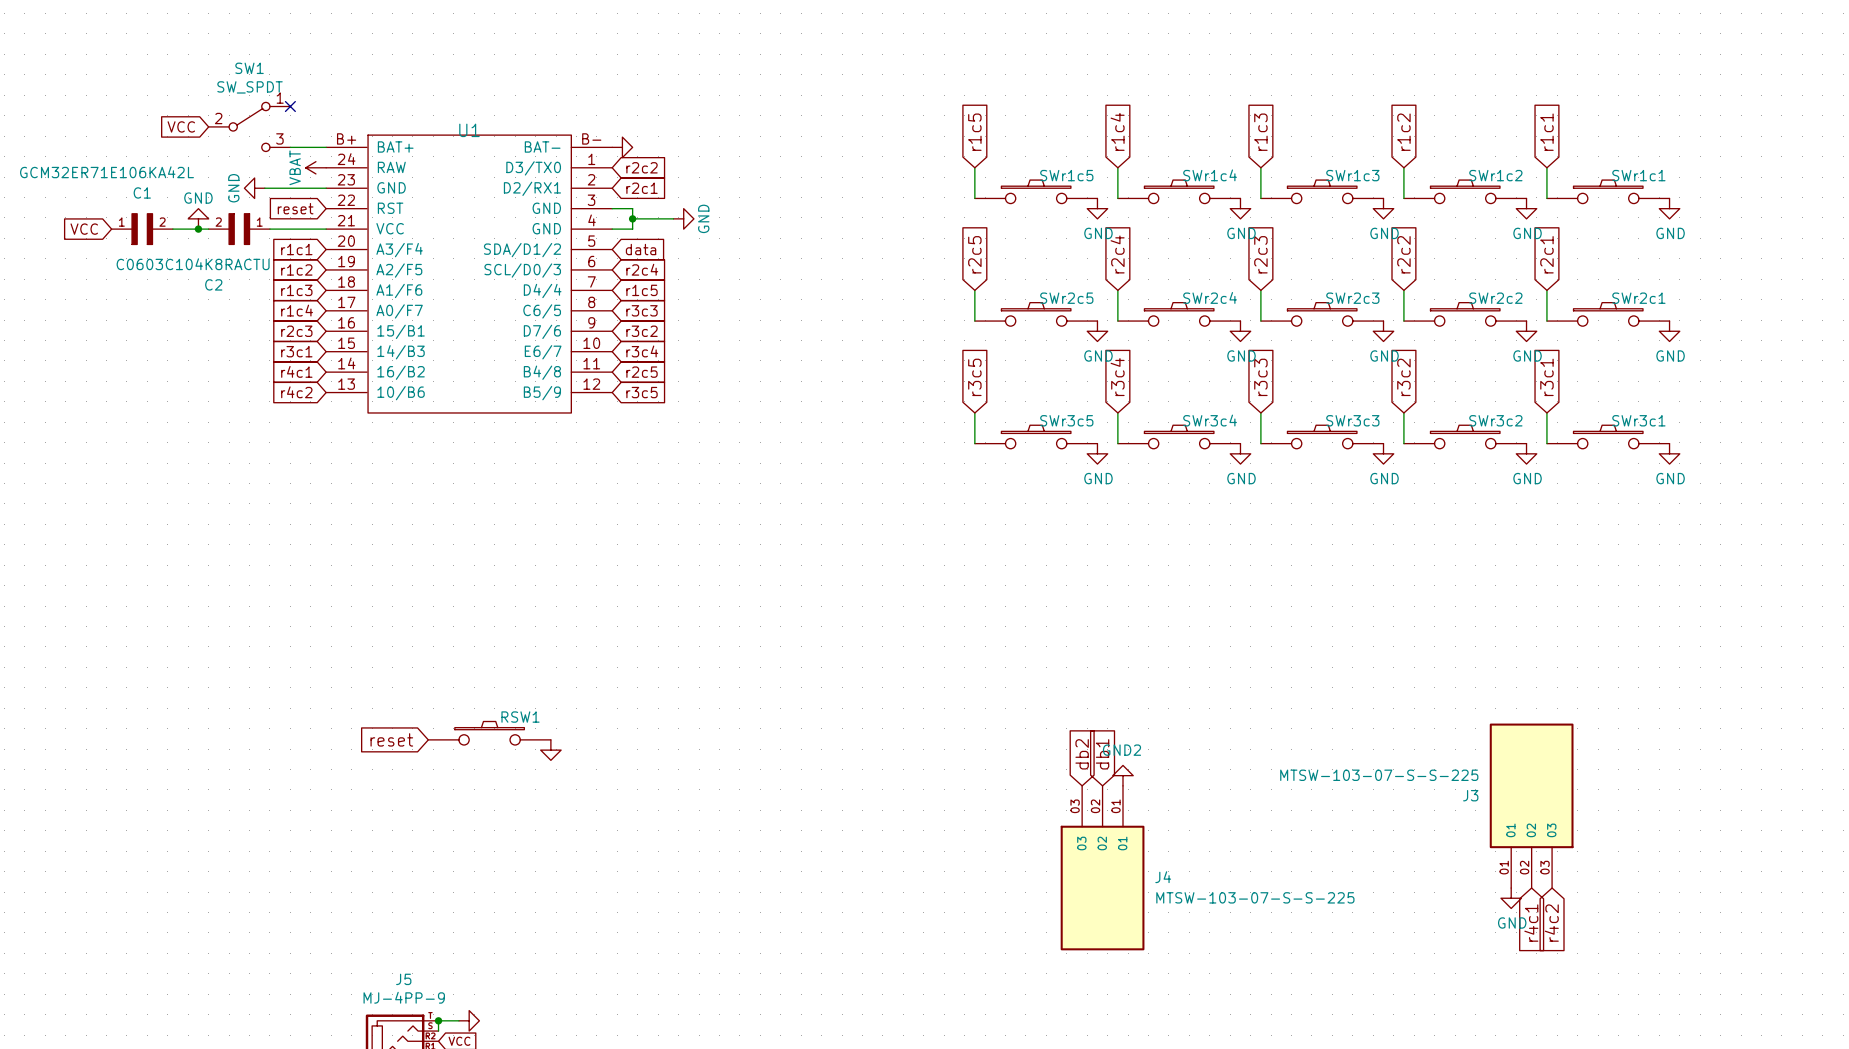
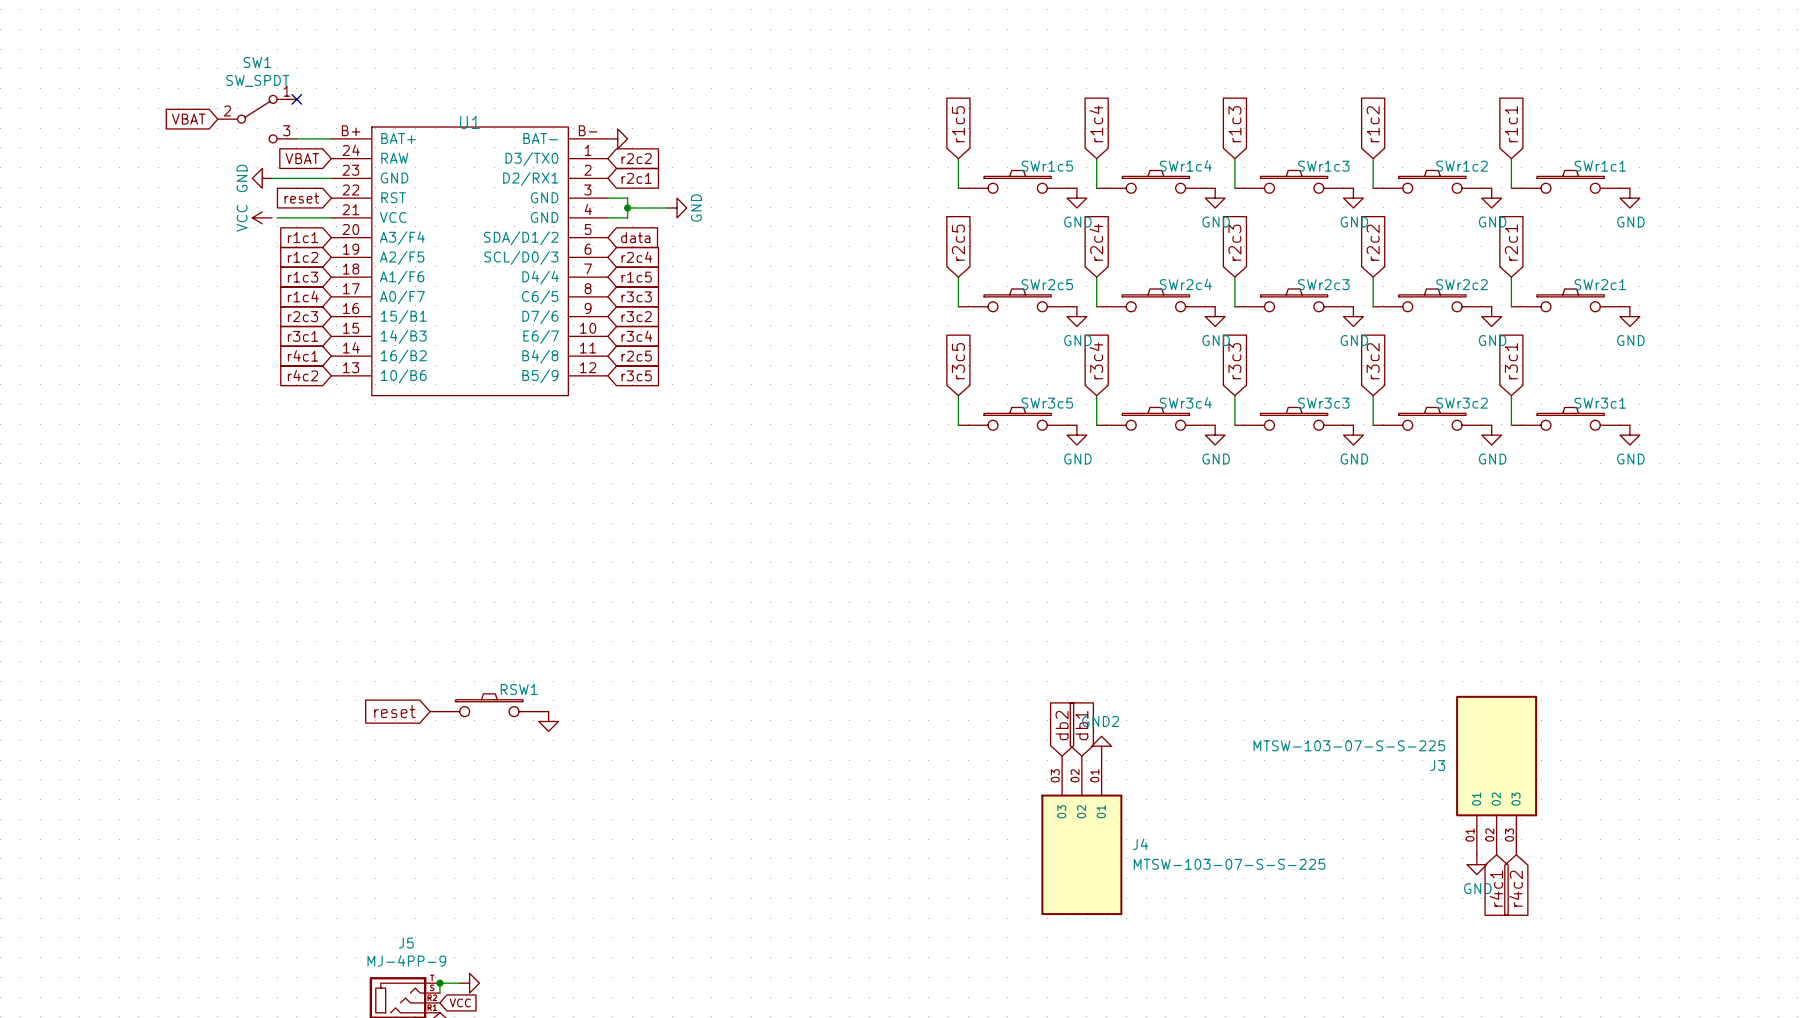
global label: VCC (181, 126) -> VBAT (188, 119)
global label: none -> VBAT (302, 158)
power symbol: VBAT (315, 167) -> none
power symbol: GND (198, 218) -> none
global label: VCC (84, 229) -> none
C1: GCM32ER71E106KA42L (142, 229) -> none
wire: (172, 229) (208, 229) -> none
junction: (198, 229) -> none
C2: C0603C104K8RACTU (239, 229) -> none
power symbol: none -> VCC (262, 217)

